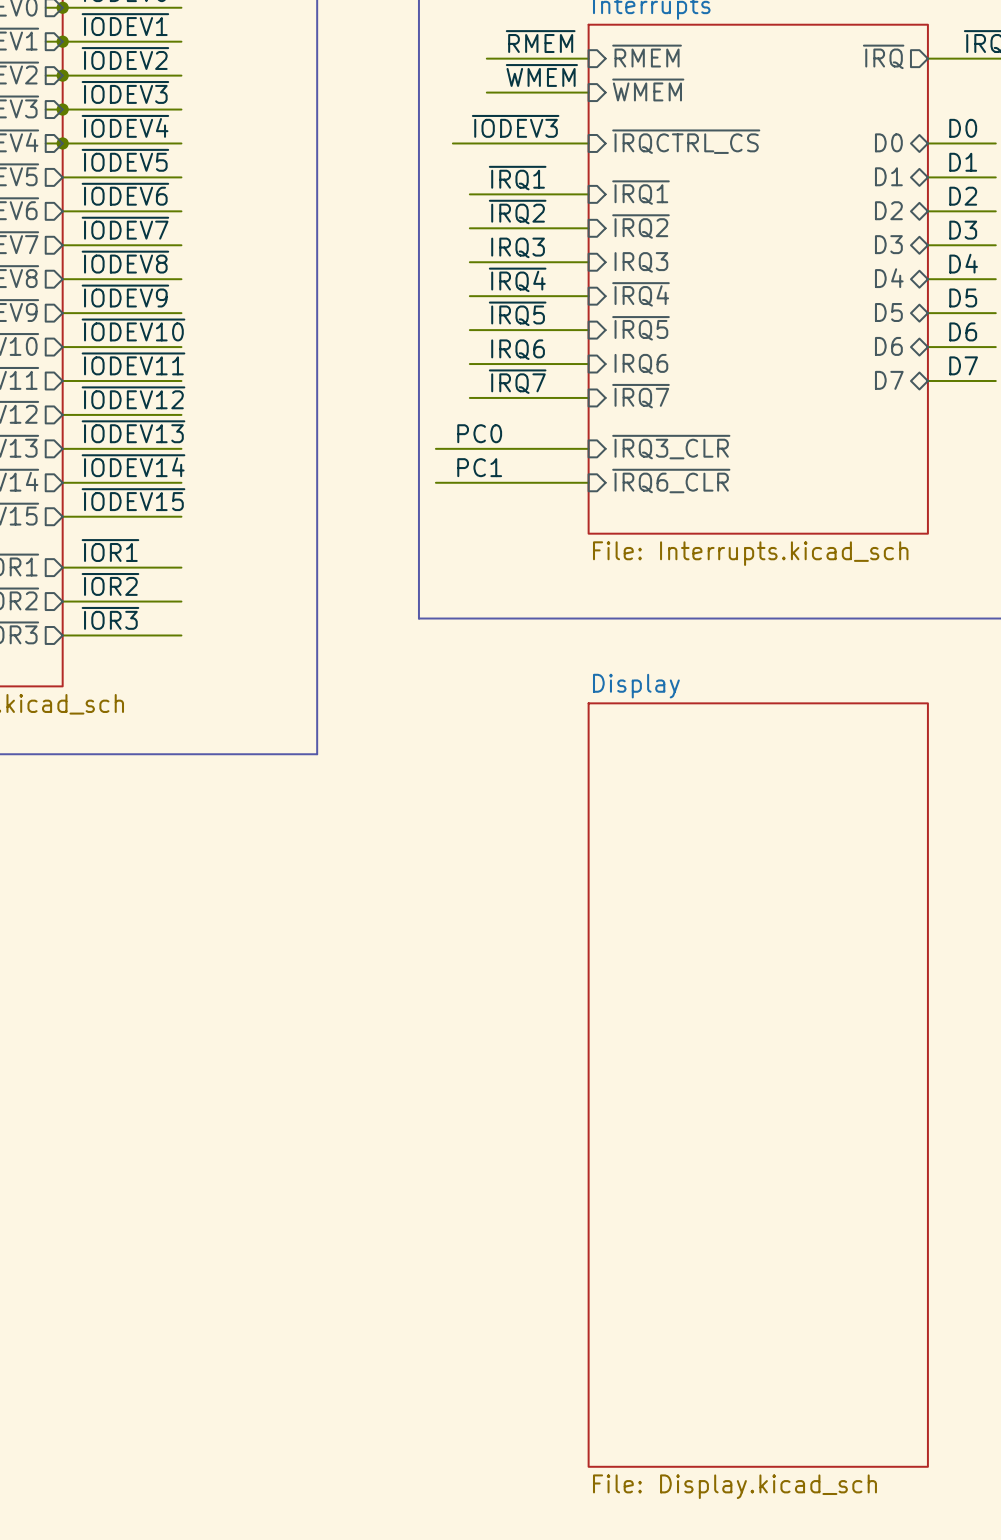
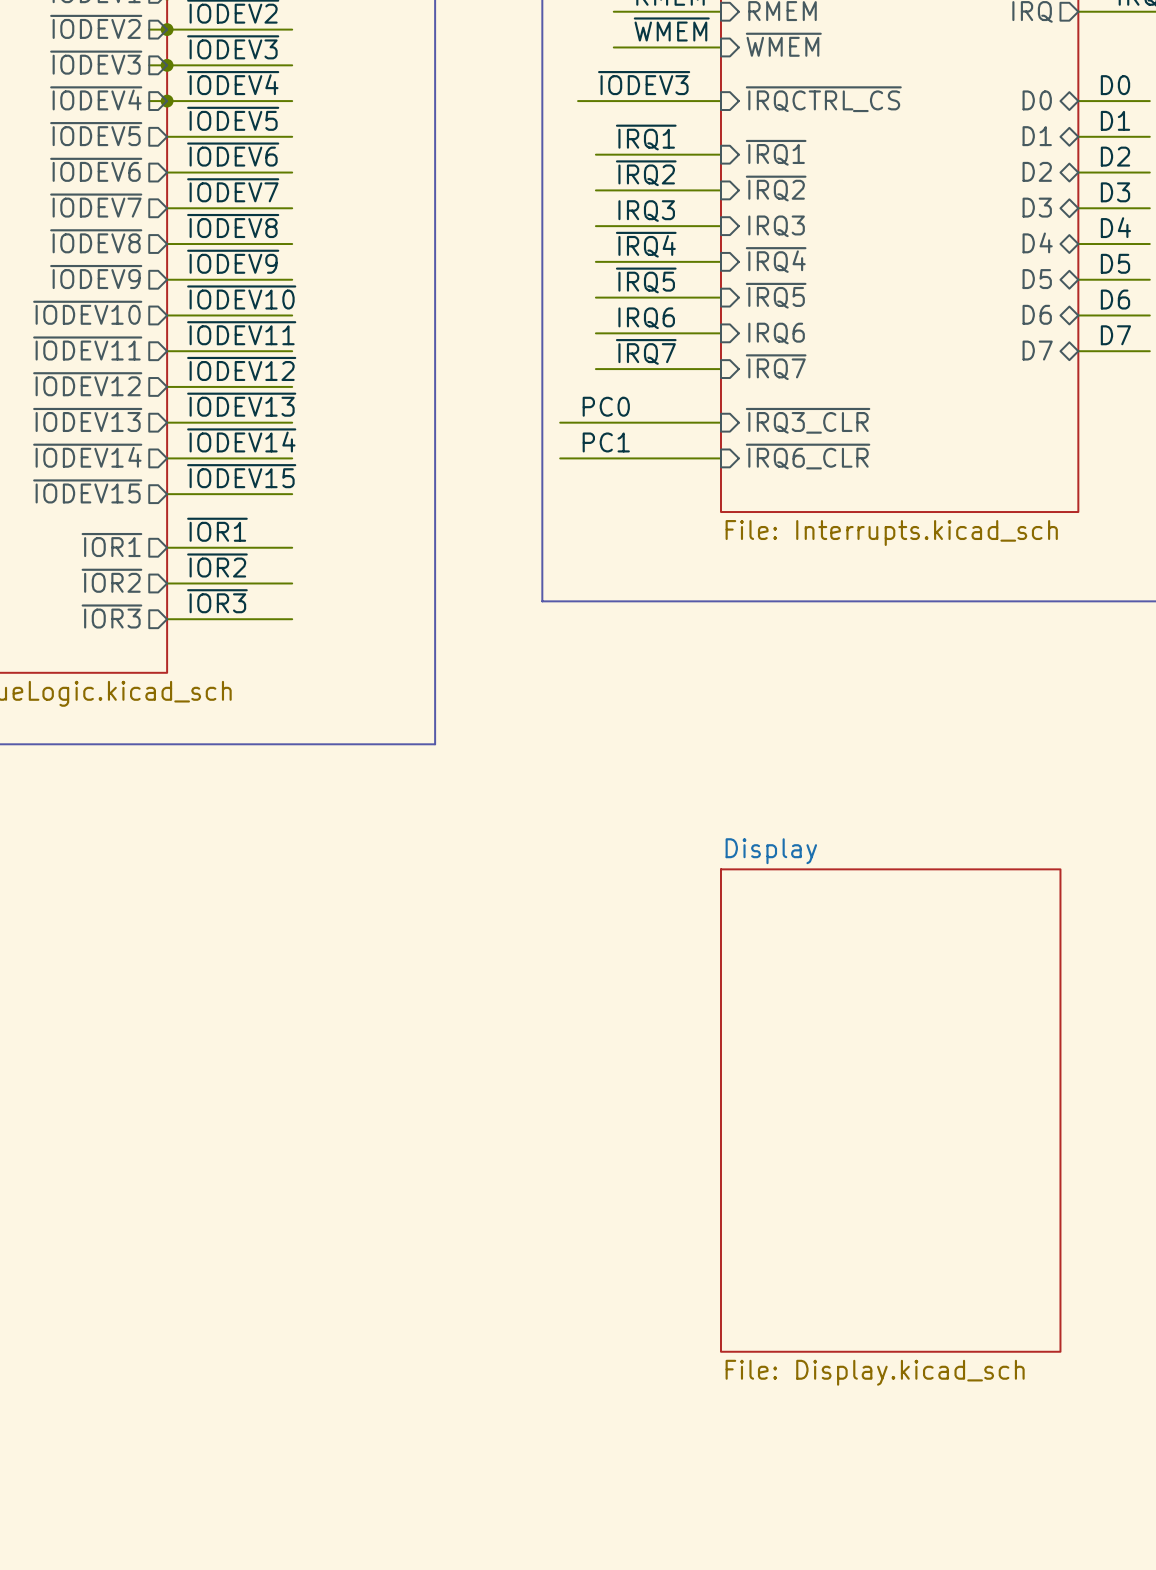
sheet Display: File: Display.kicad_sch (758, 1085) -> none
sheet Display: none -> File: Display.kicad_sch (890, 1110)

